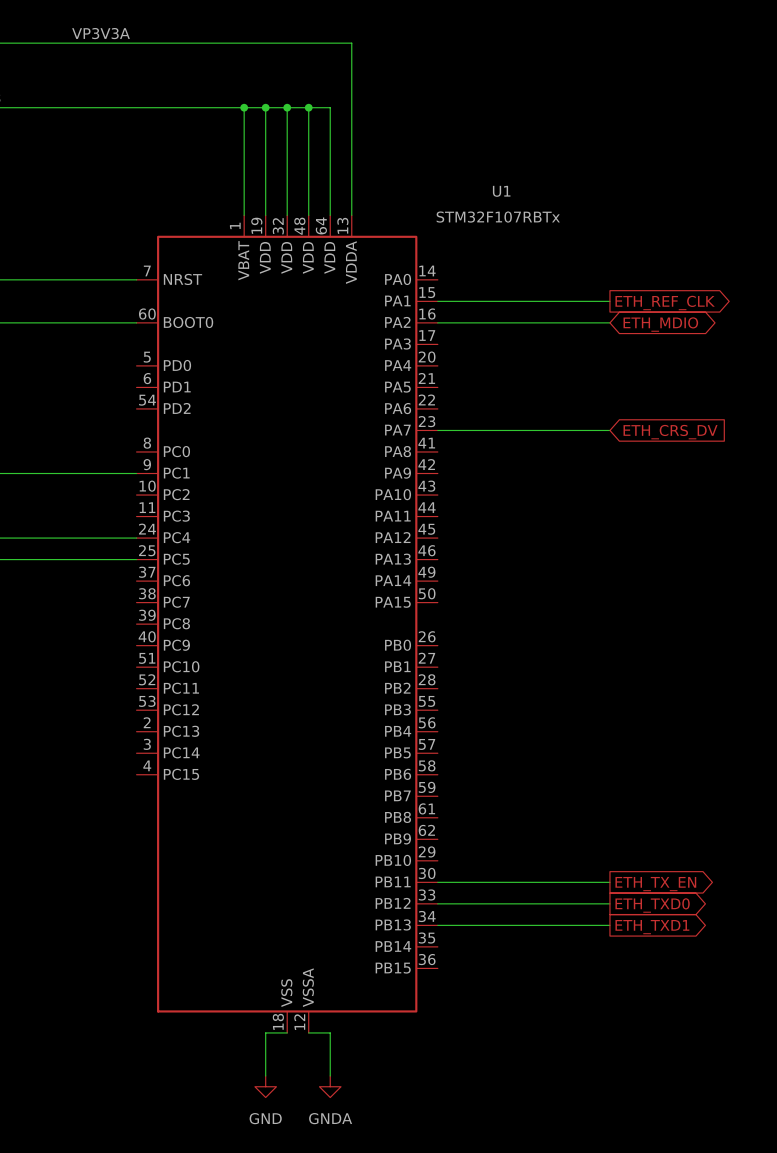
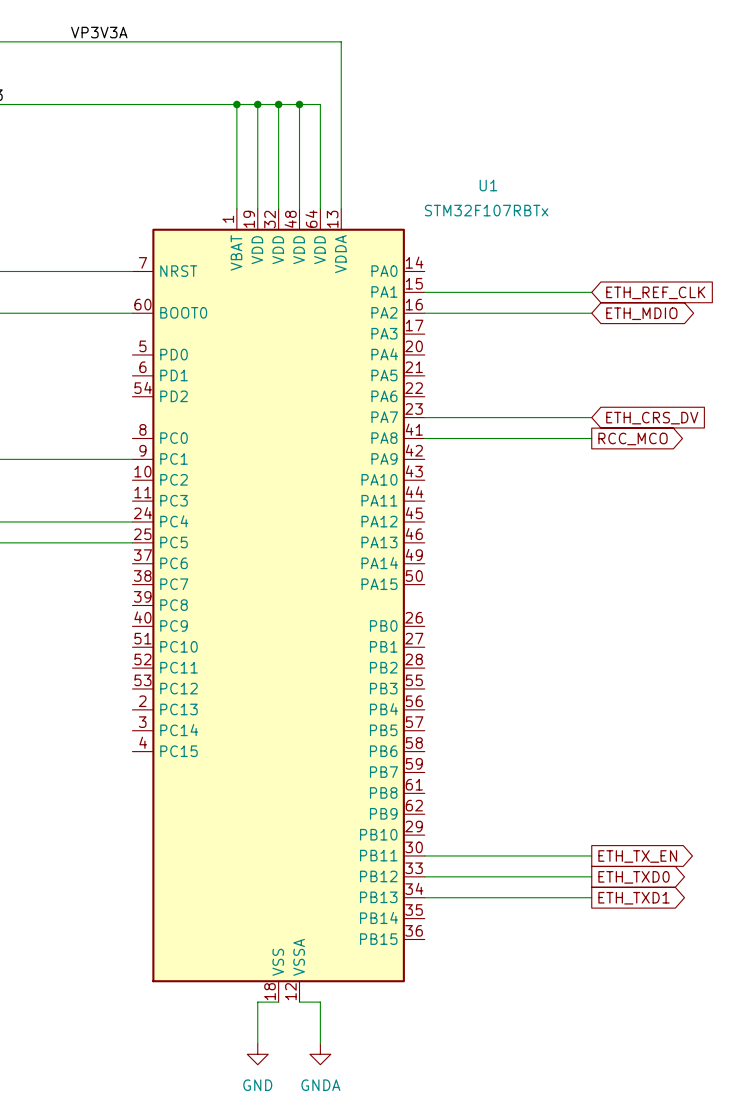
global label shape: output (665, 303) -> input (655, 292)
wire: none -> (424, 438) (591, 438)
global label: none -> RCC_MCO (633, 438)

